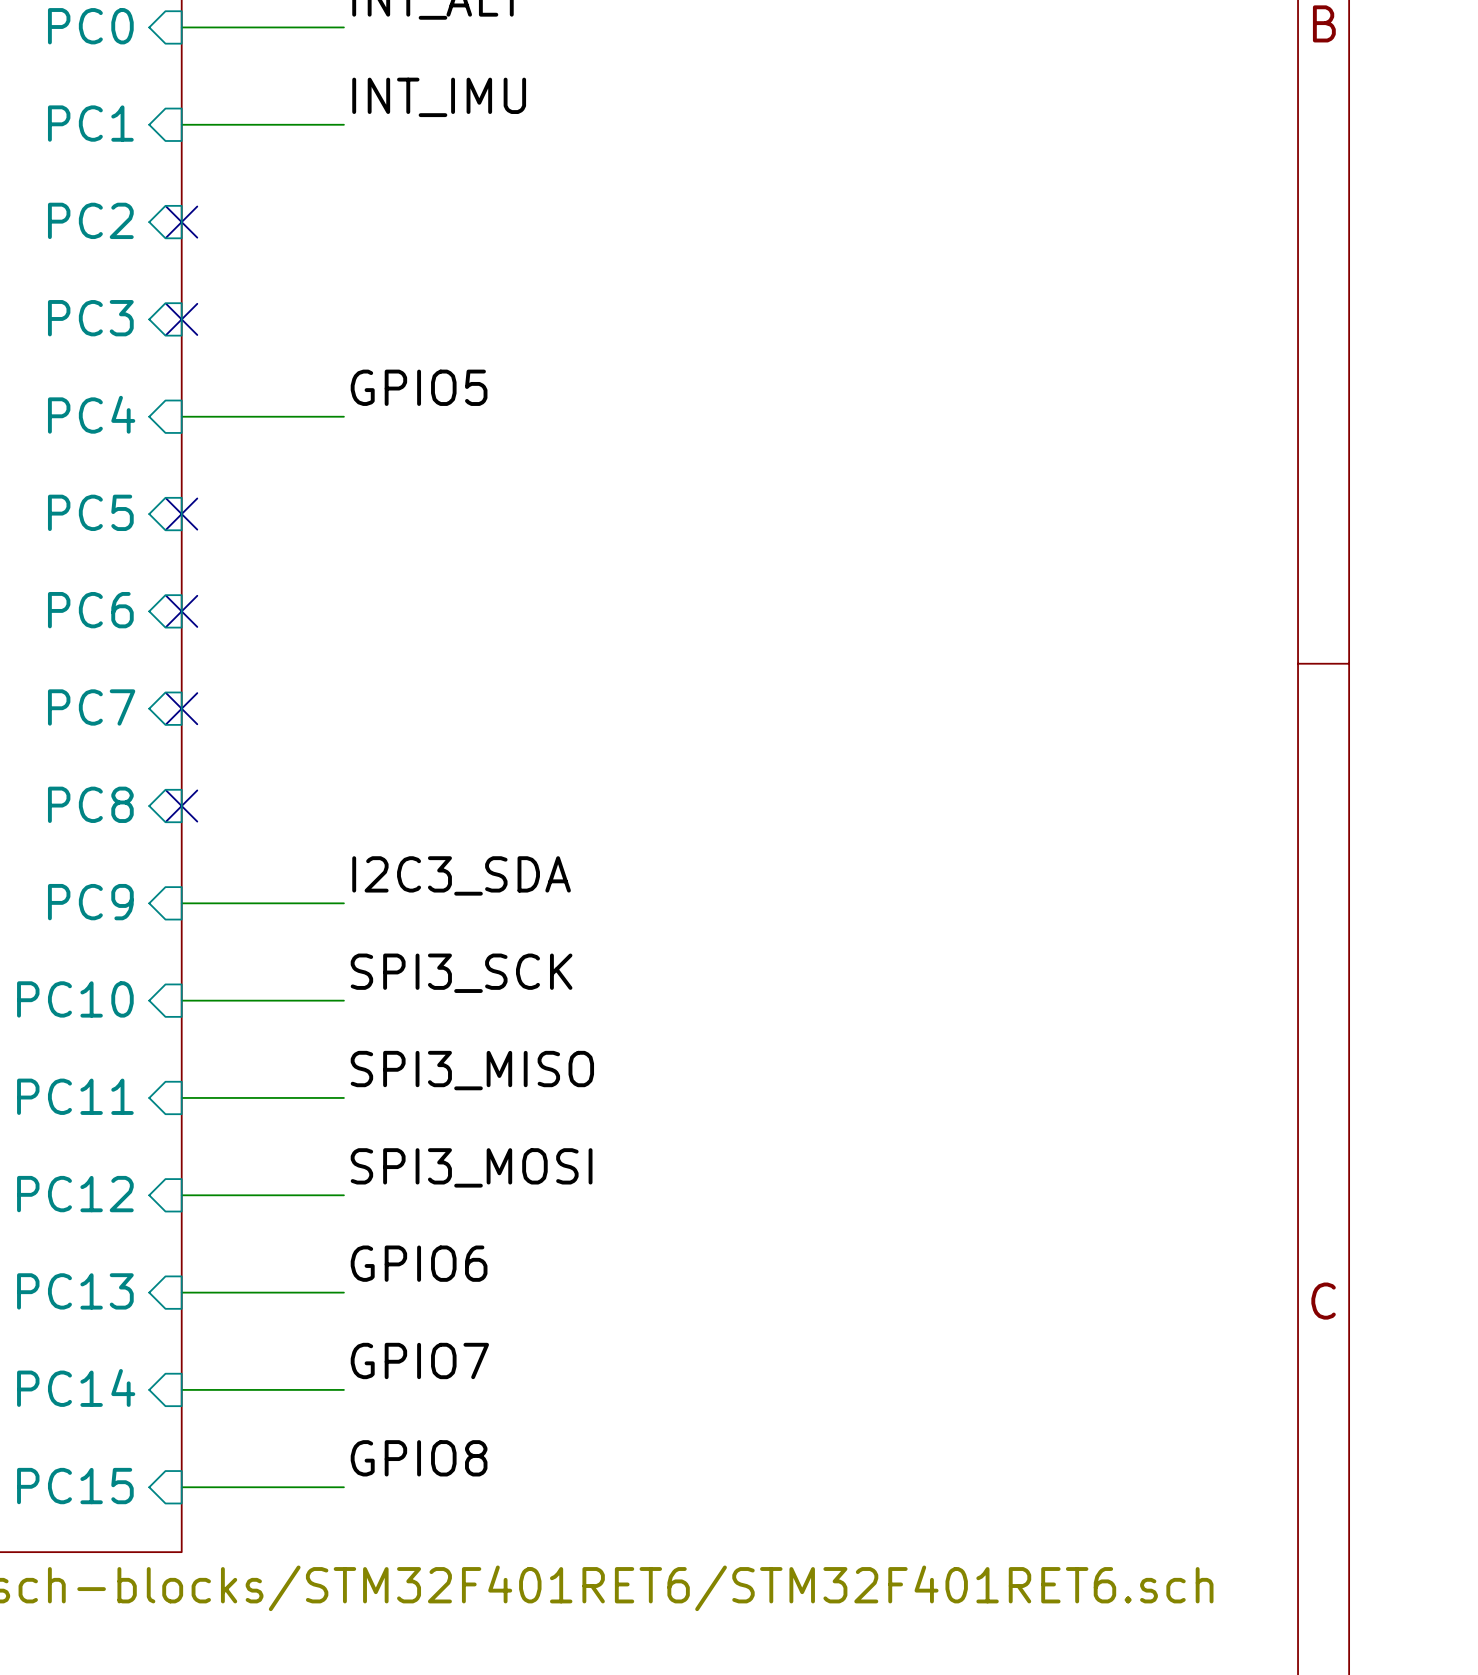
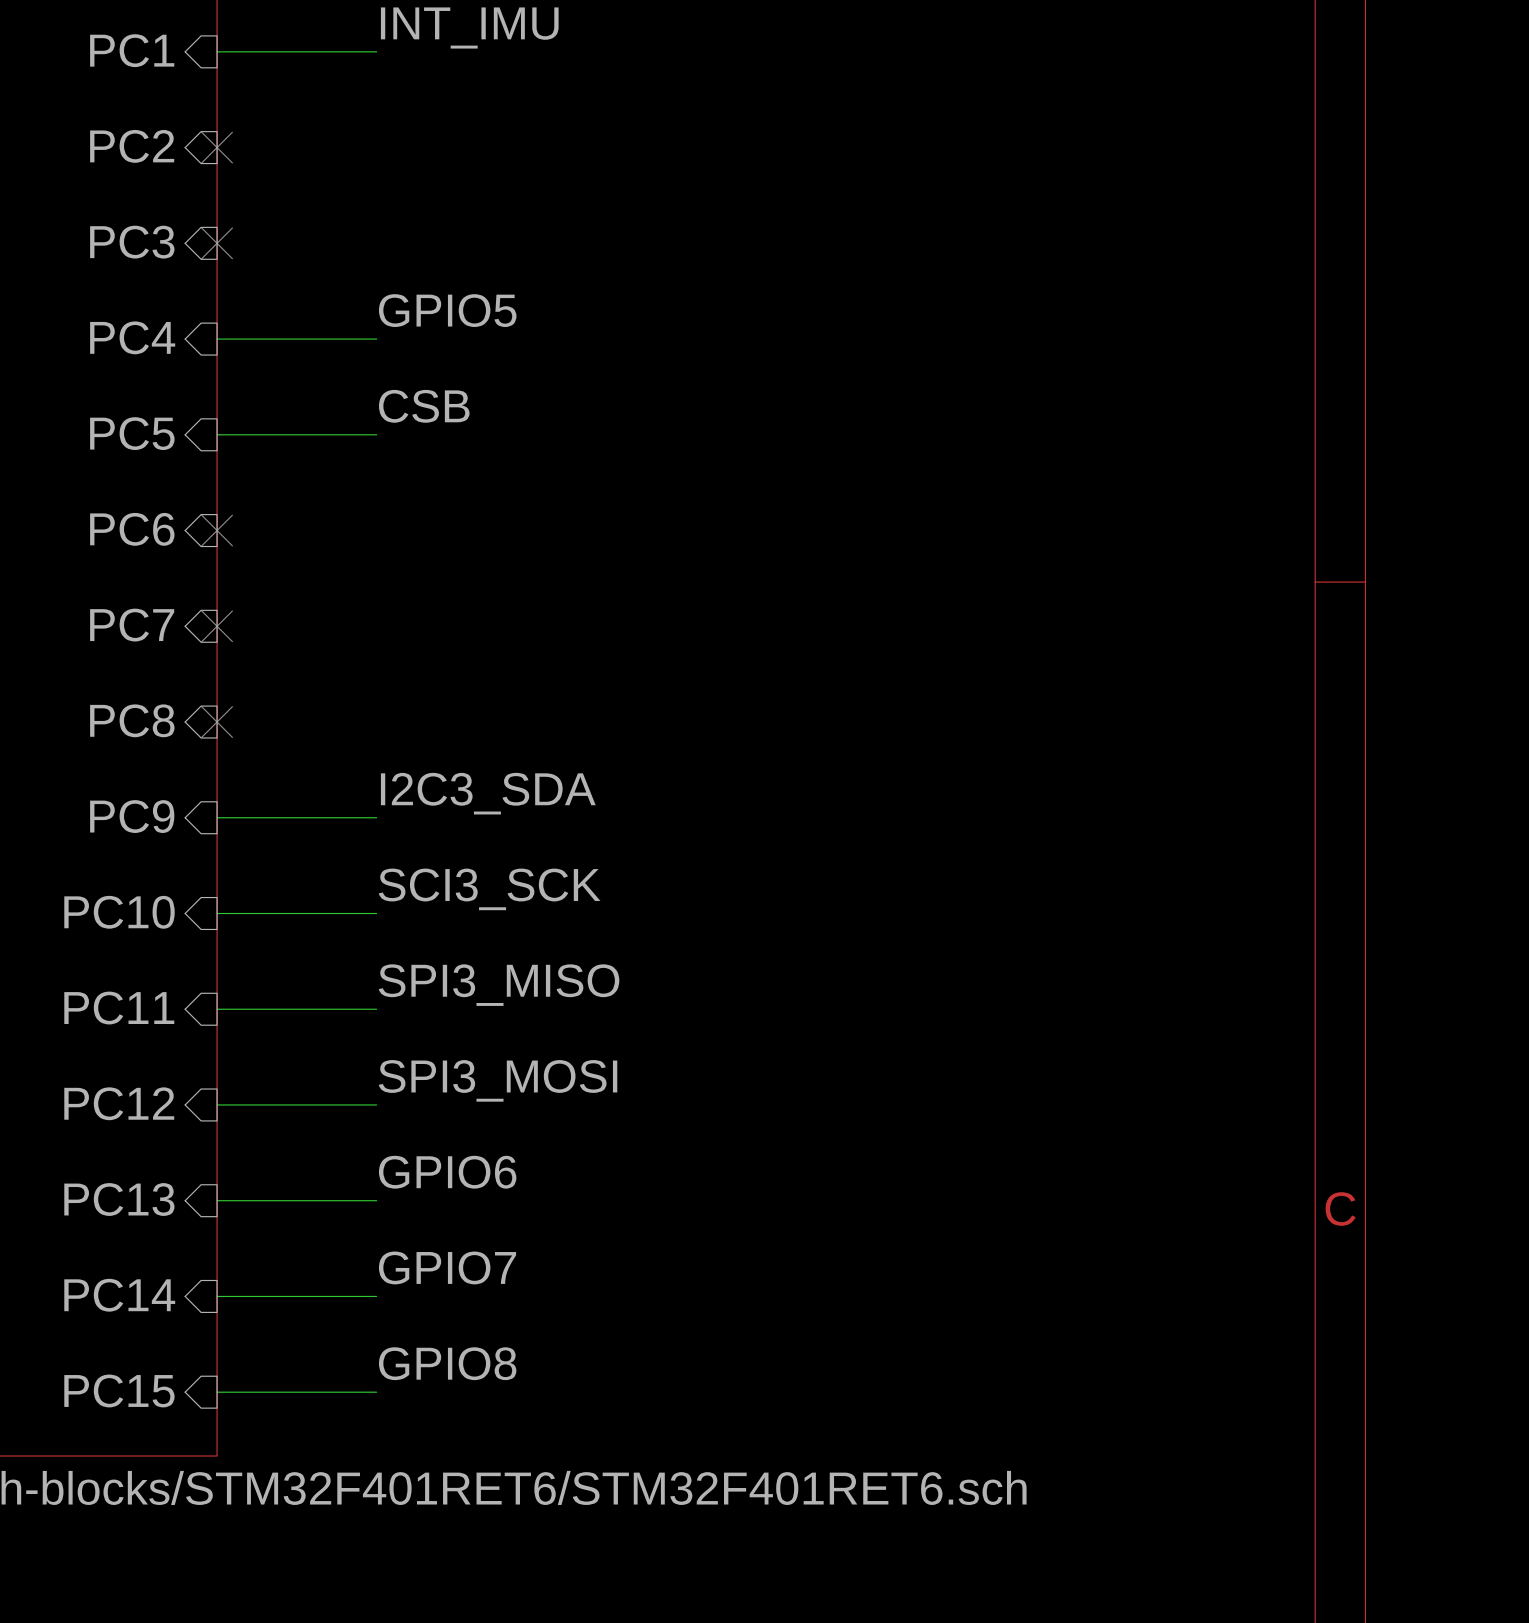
label: none -> CSB (424, 406)
wire: none -> (217, 434) (376, 434)
no-connect mark: (181, 514) -> none
label: SPI3_SCK (461, 973) -> SCI3_SCK (489, 889)

